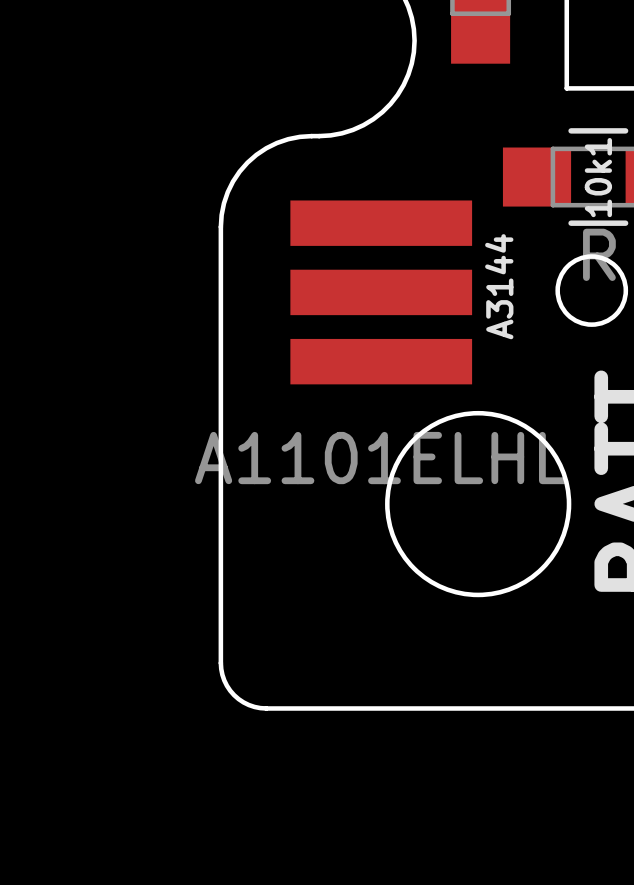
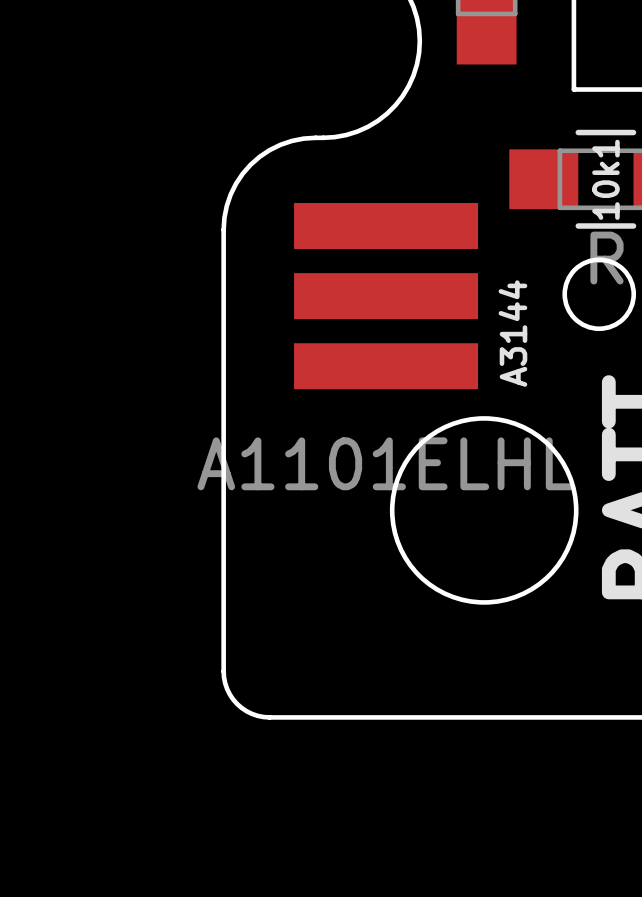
A3144 name position: A3144 (499, 286) -> A3144 (512, 333)

